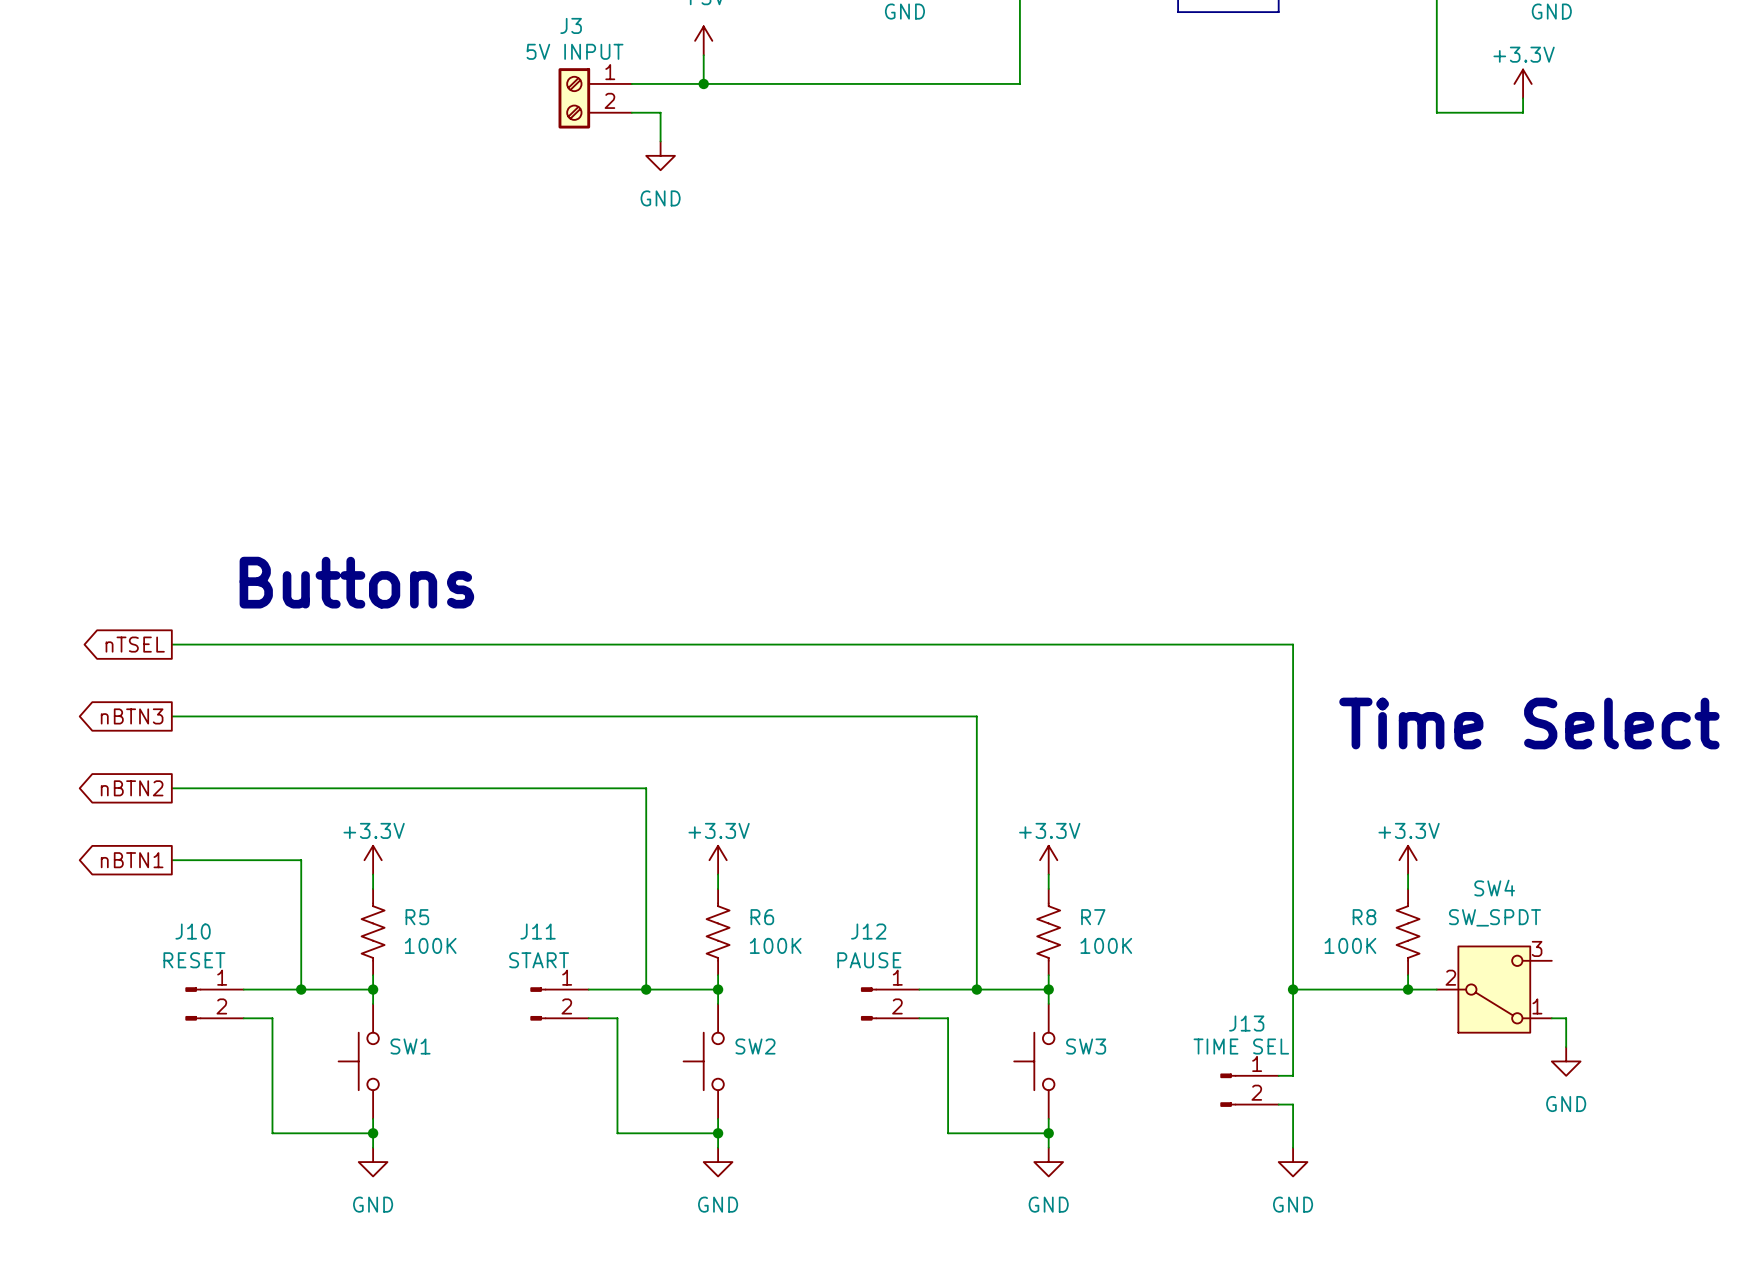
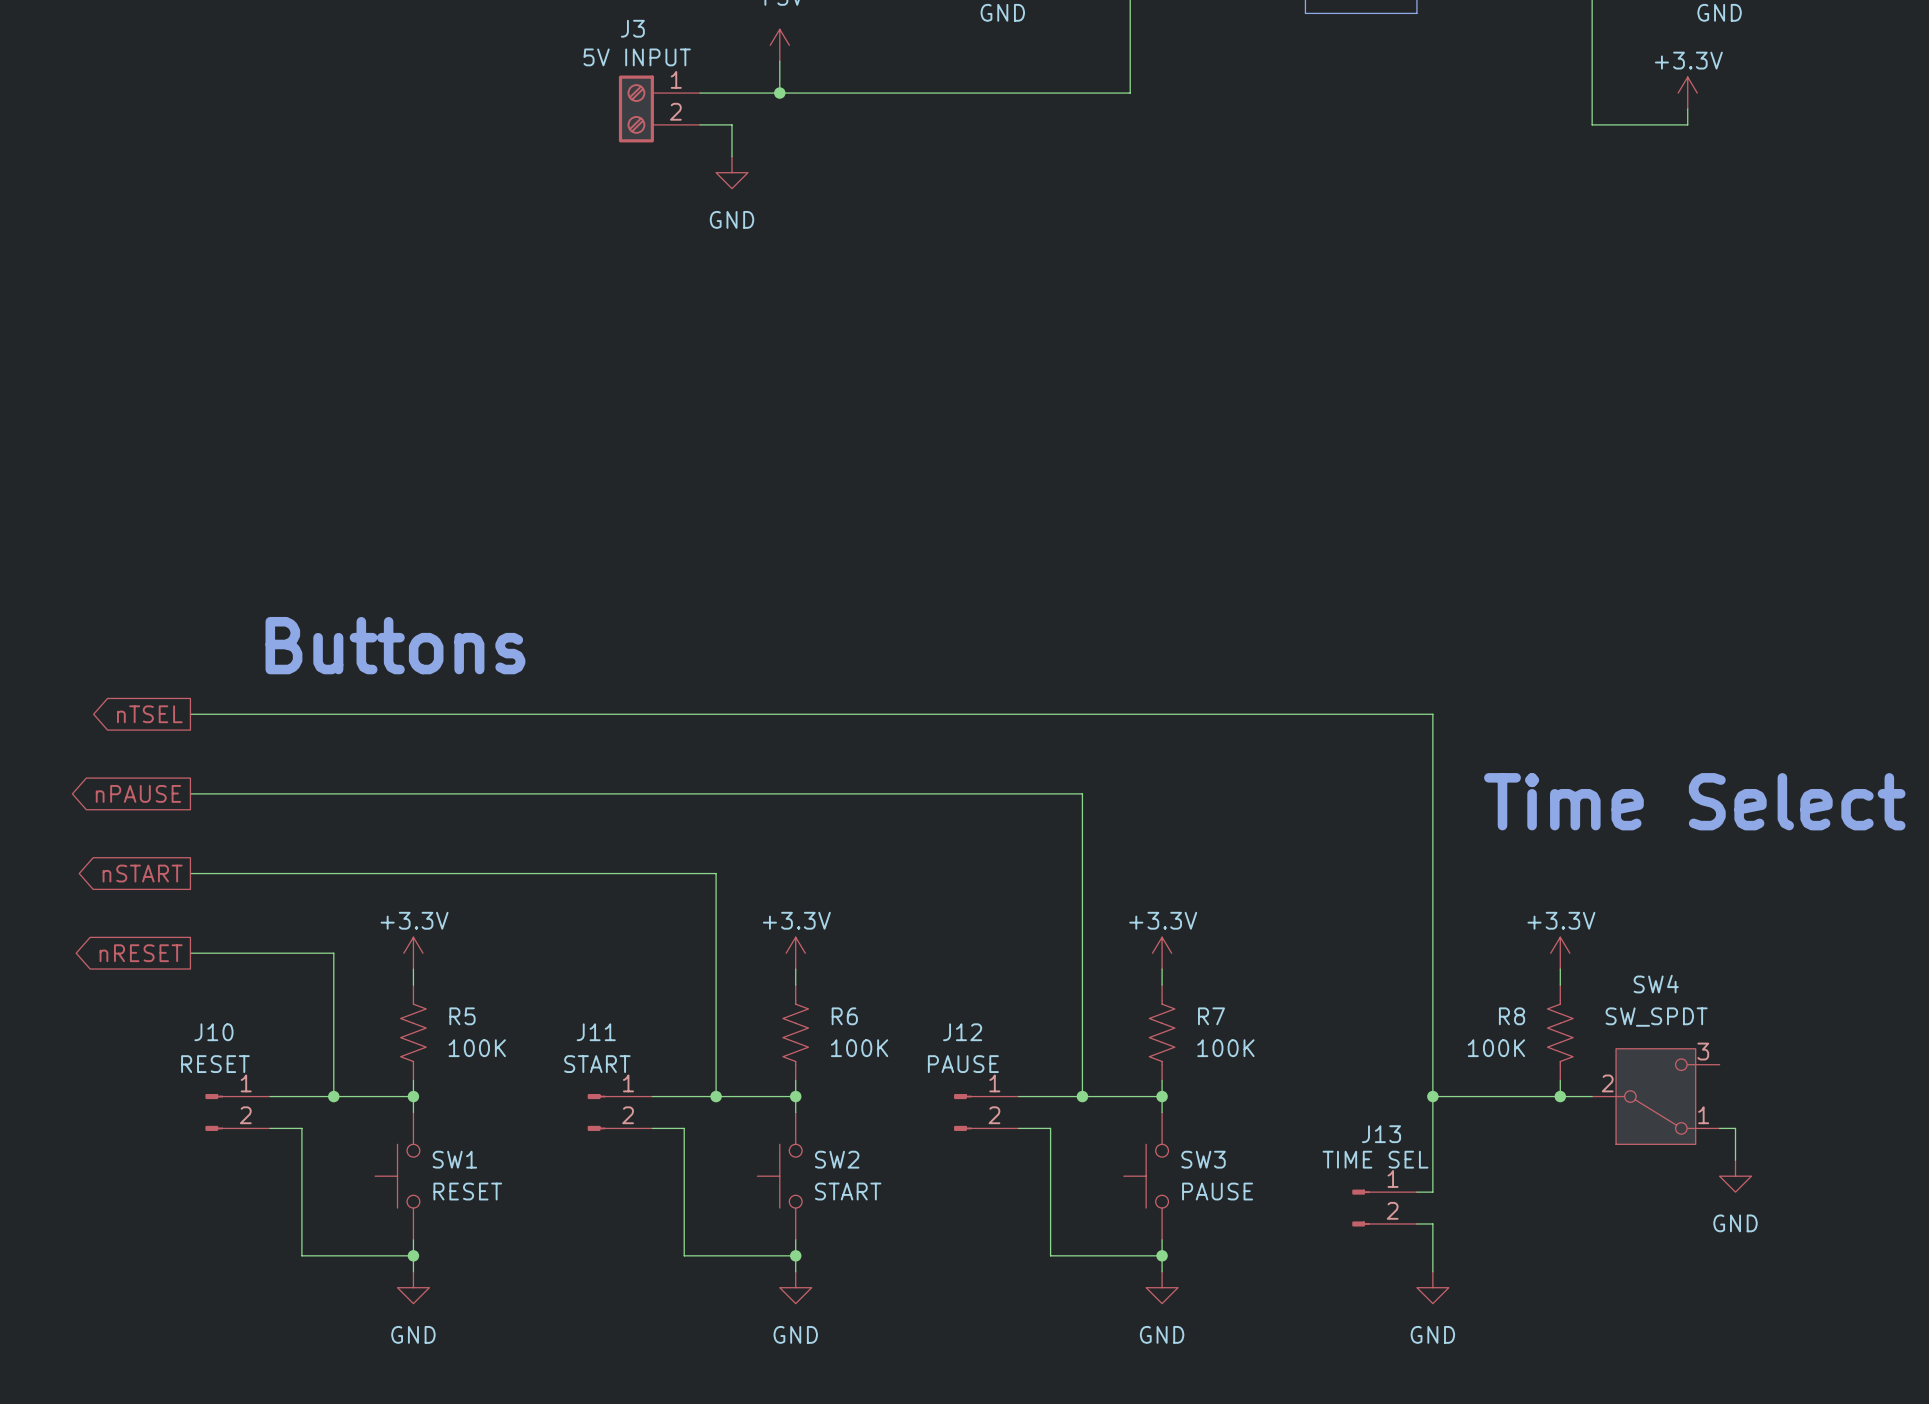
global label: nBTN3 (132, 716) -> nPAUSE (138, 793)
global label: nBTN2 (132, 788) -> nSTART (142, 873)
global label: nBTN1 (132, 860) -> nRESET (141, 953)
SW1 value: none -> RESET (467, 1191)
SW2 value: none -> START (848, 1191)
SW3 value: none -> PAUSE (1217, 1191)

